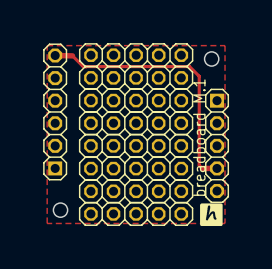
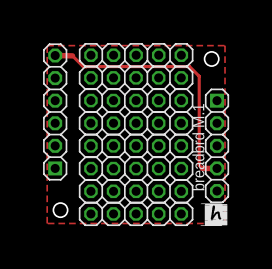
text: breadboard M.1 (199, 137) -> breadbrd M.1 (198, 147)
drawing: [200, 204, 223, 226] -> none
drawing: none -> [204, 204, 228, 226]

